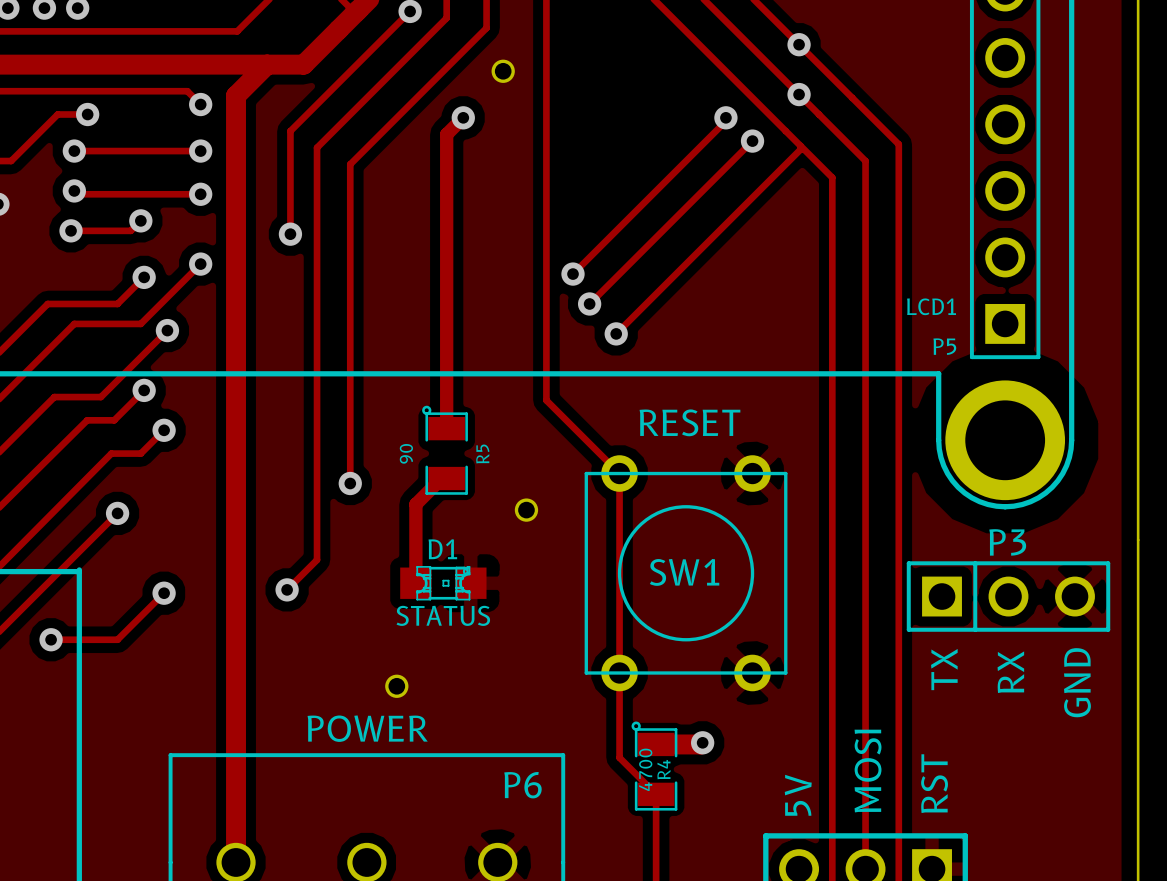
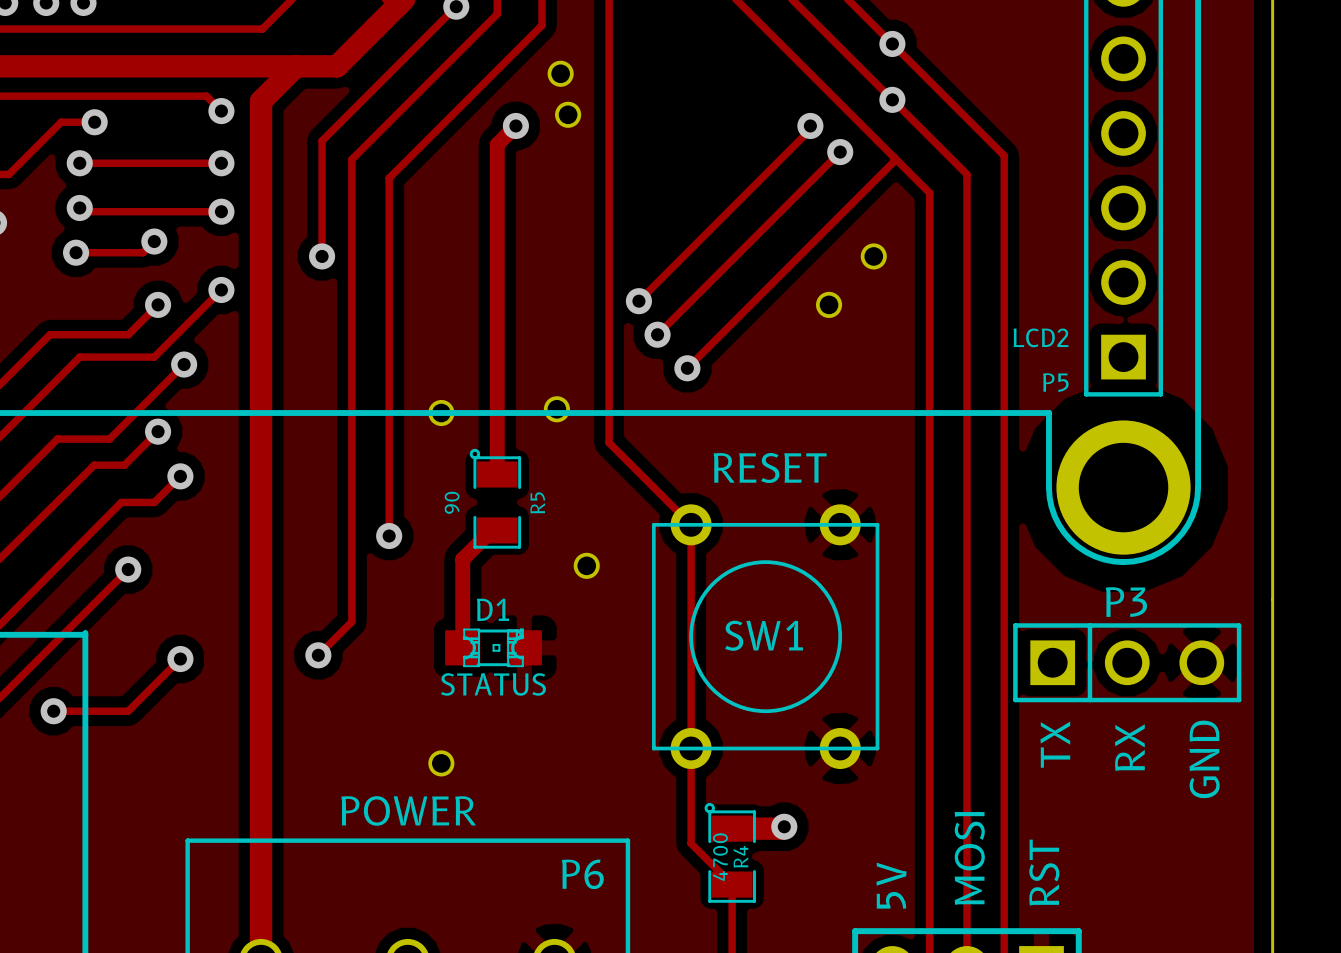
part: none -> (568, 114)
part: none -> (873, 256)
part: none -> (829, 304)
P5 value: LCD1 (931, 306) -> LCD2 (1041, 337)
part: none -> (556, 409)
part: none -> (441, 413)

